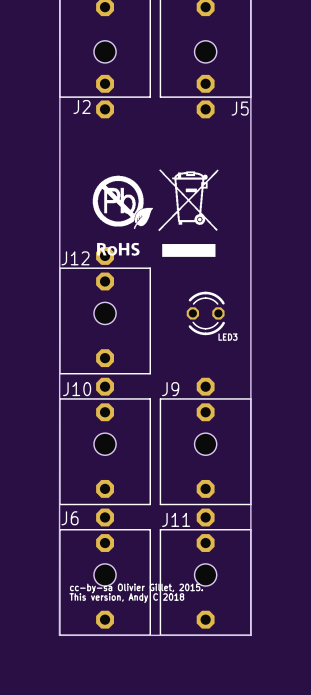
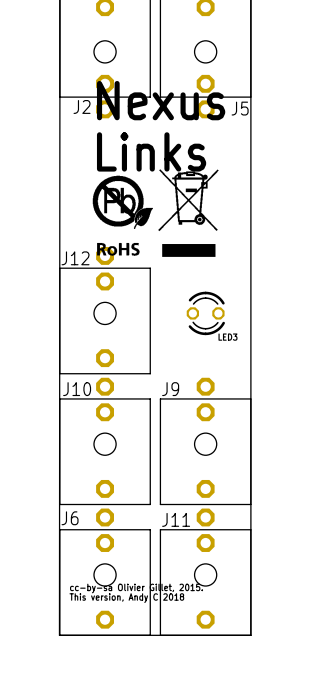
text: none -> Nexus (161, 100)
text: none -> Links (151, 151)

